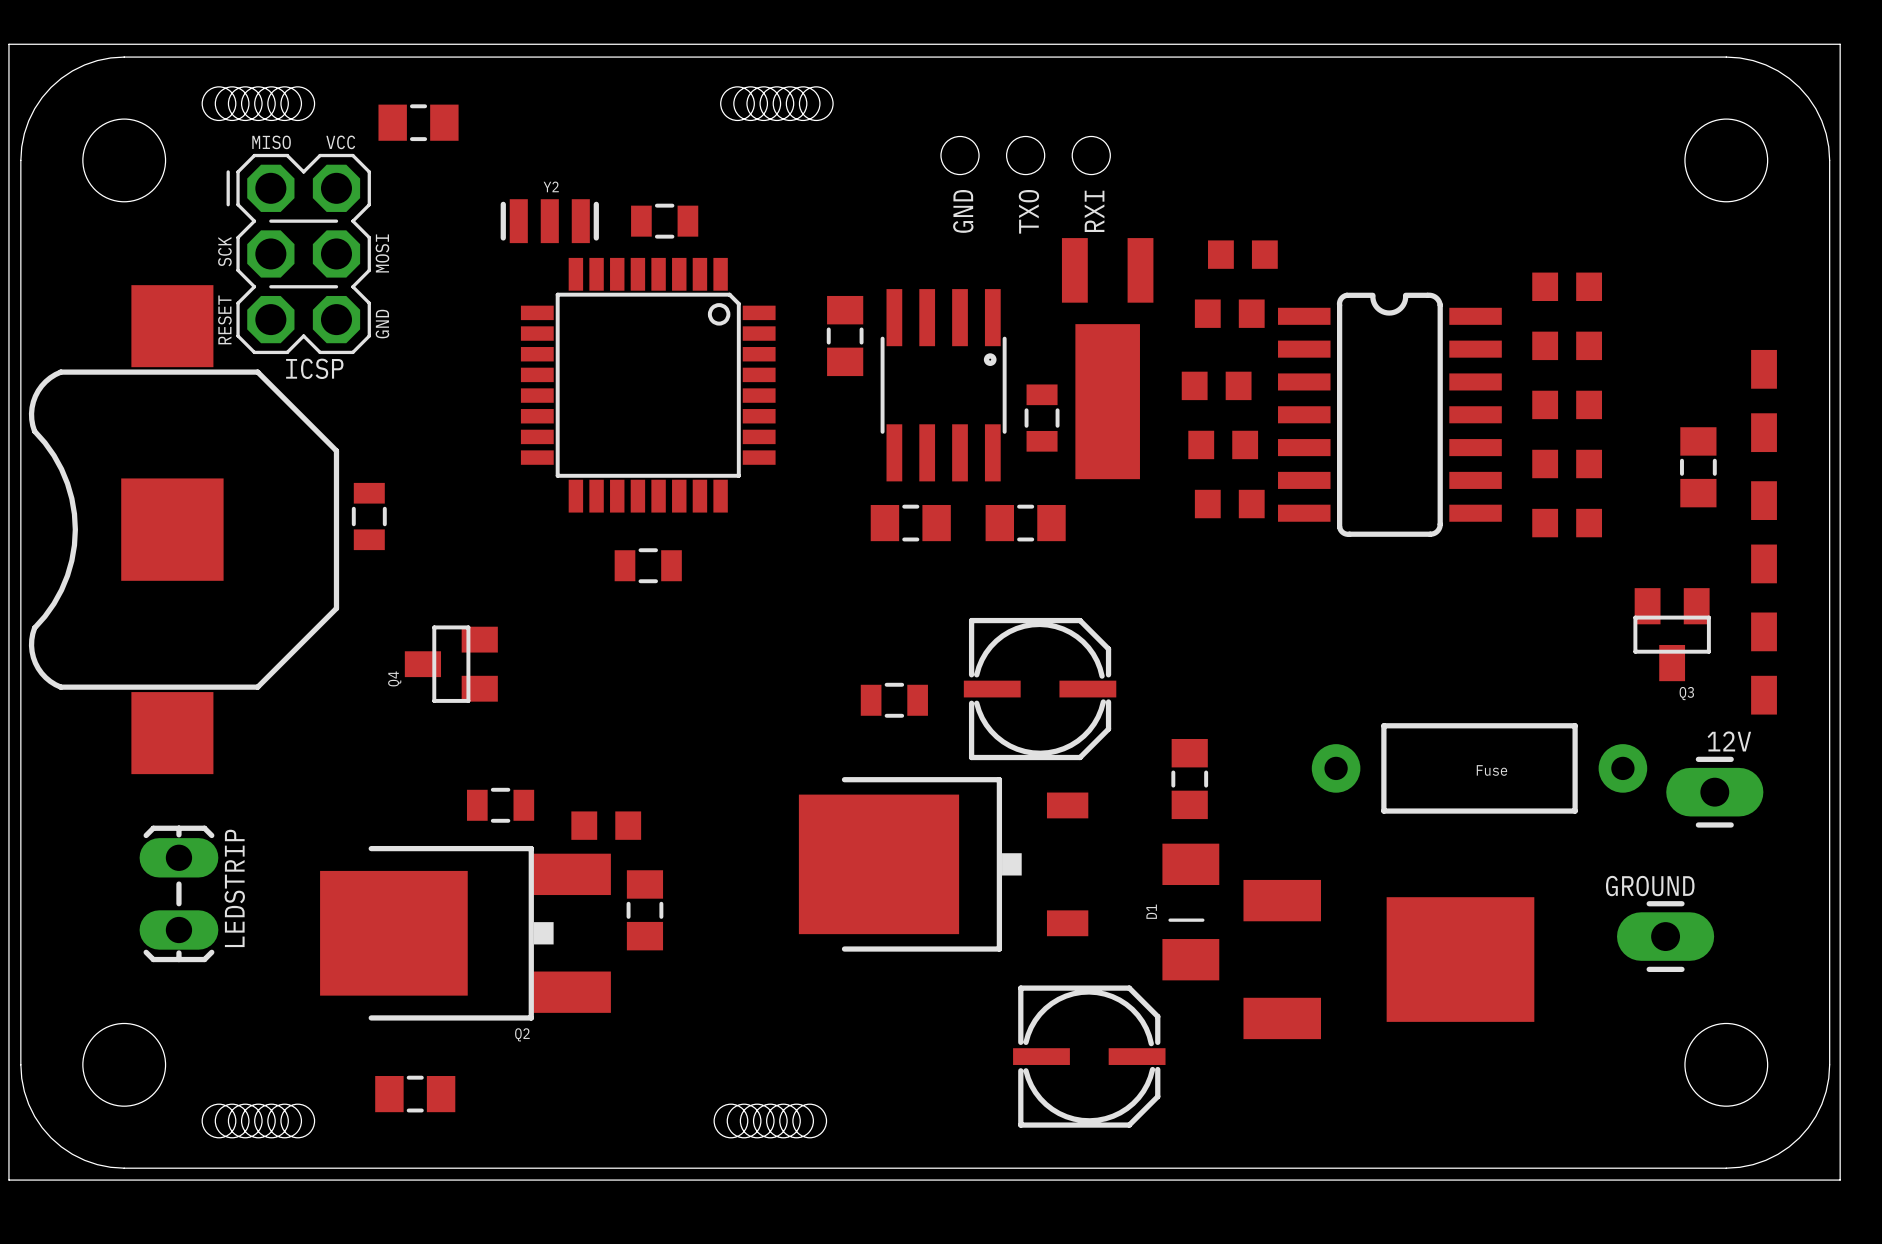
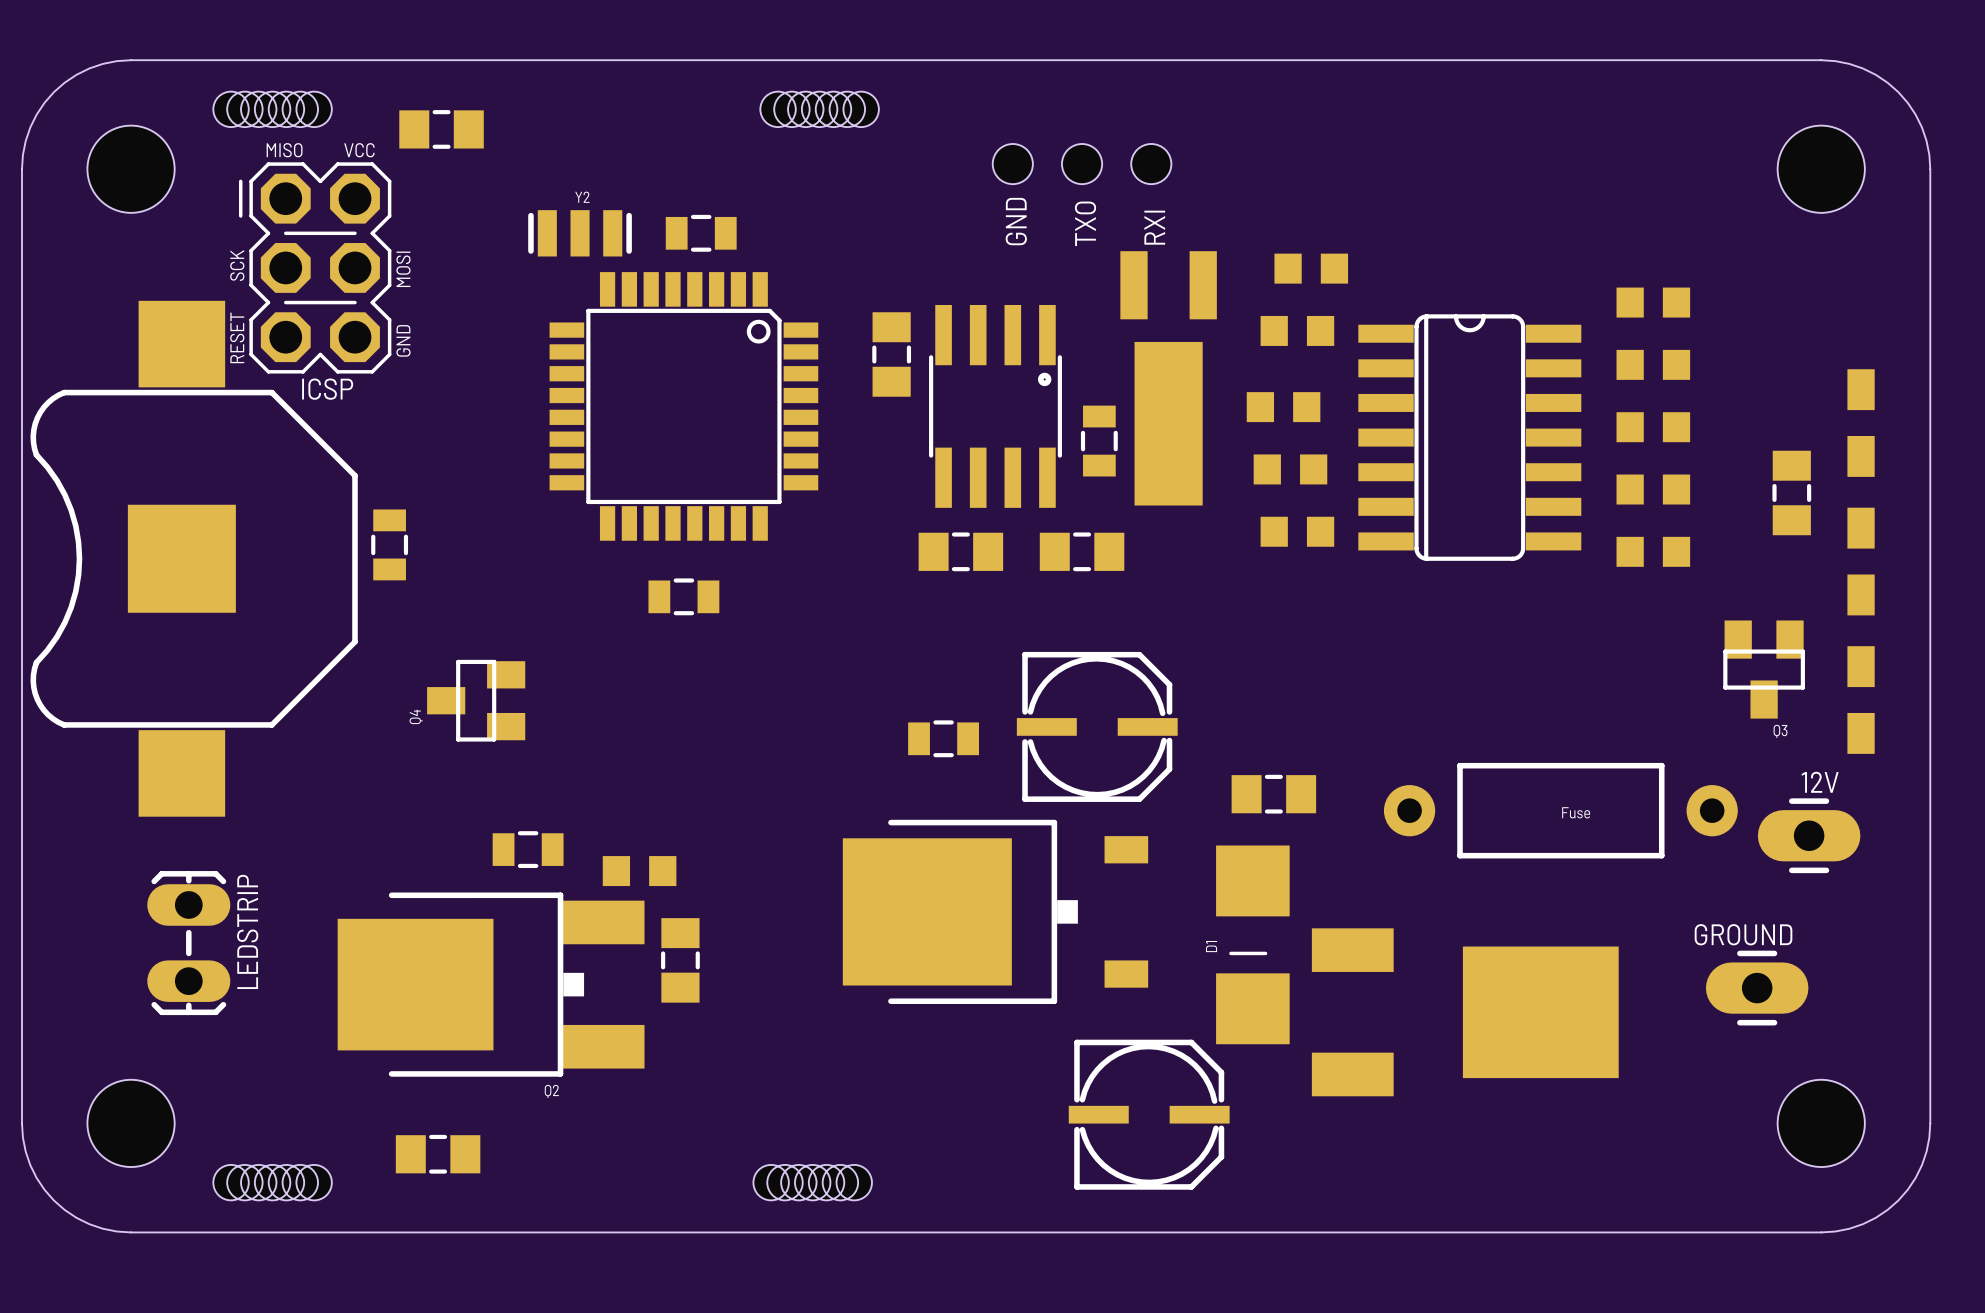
board edge: (8, 44) (1840, 44) (1840, 1180) (8, 1180) (8, 44) -> none
part footprint: [1278, 292, 1502, 537] -> [1358, 314, 1582, 561]
part rotation: 0° (1189, 779) -> 90° clockwise (1273, 794)
D1 footprint: [1162, 843, 1220, 981] -> [1216, 845, 1290, 1045]

